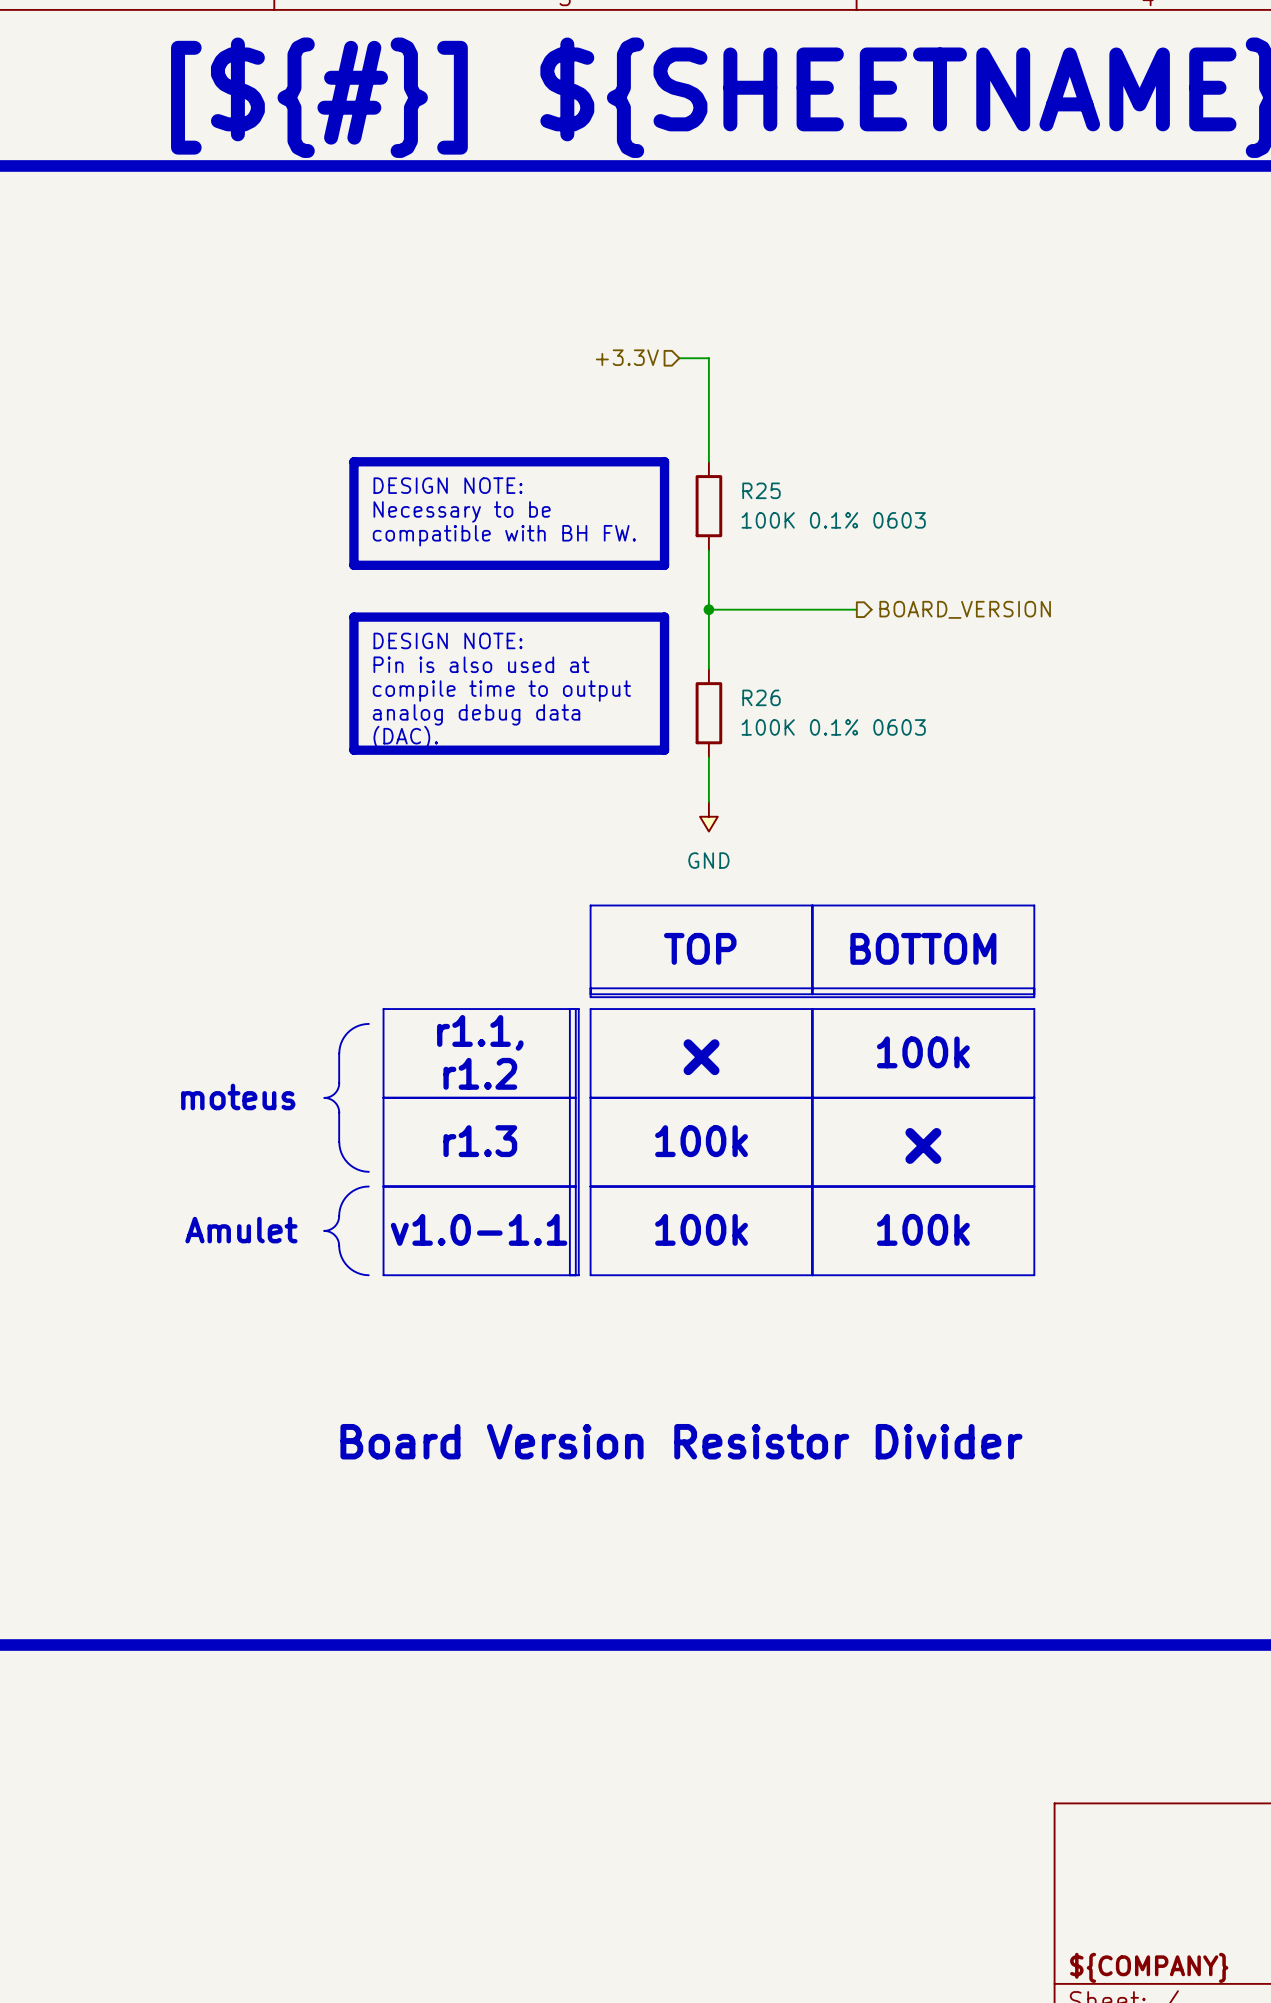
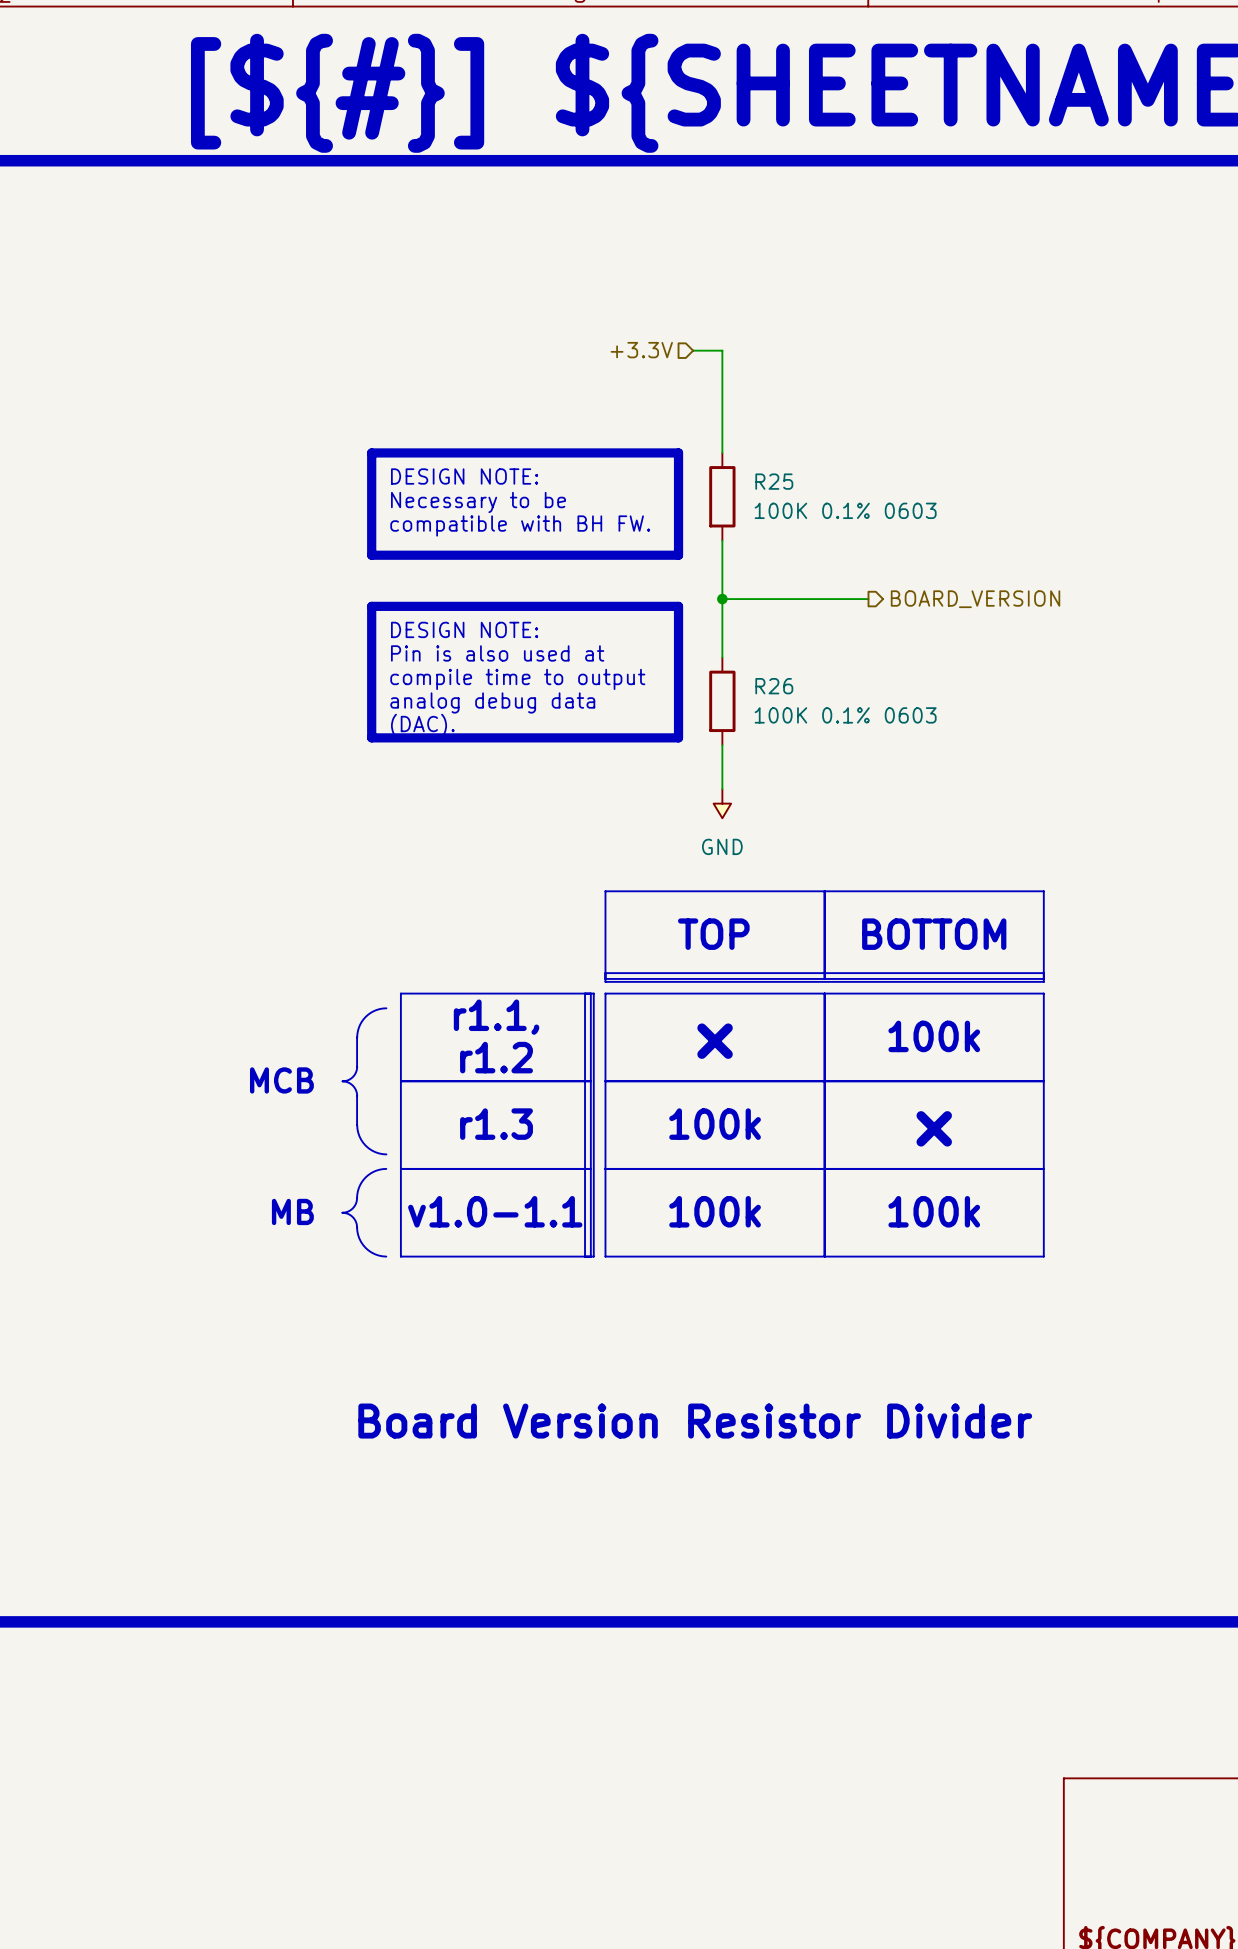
text: moteus (238, 1096) -> MCB (281, 1080)
text: Amulet (241, 1230) -> MB (292, 1211)

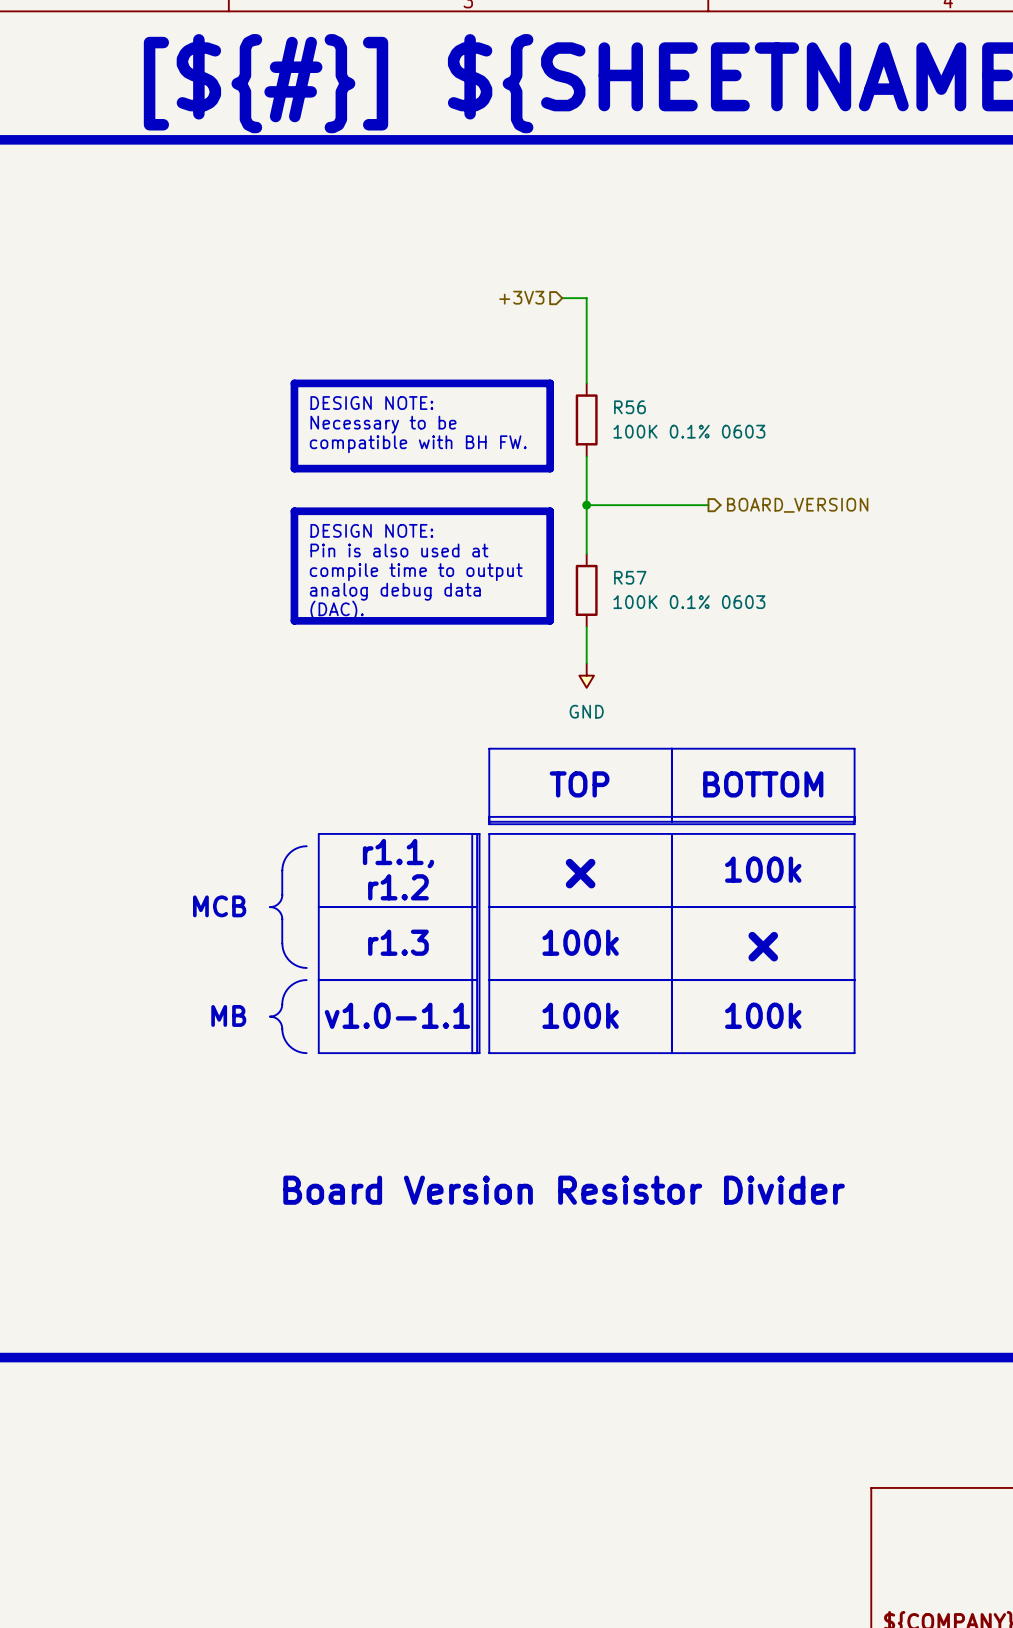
hierarchical label: +3.3V (641, 350) -> +3V3 (521, 297)
R25 name: R25 (774, 481) -> R56 (629, 407)
R26 name: R26 (774, 686) -> R57 (630, 577)

